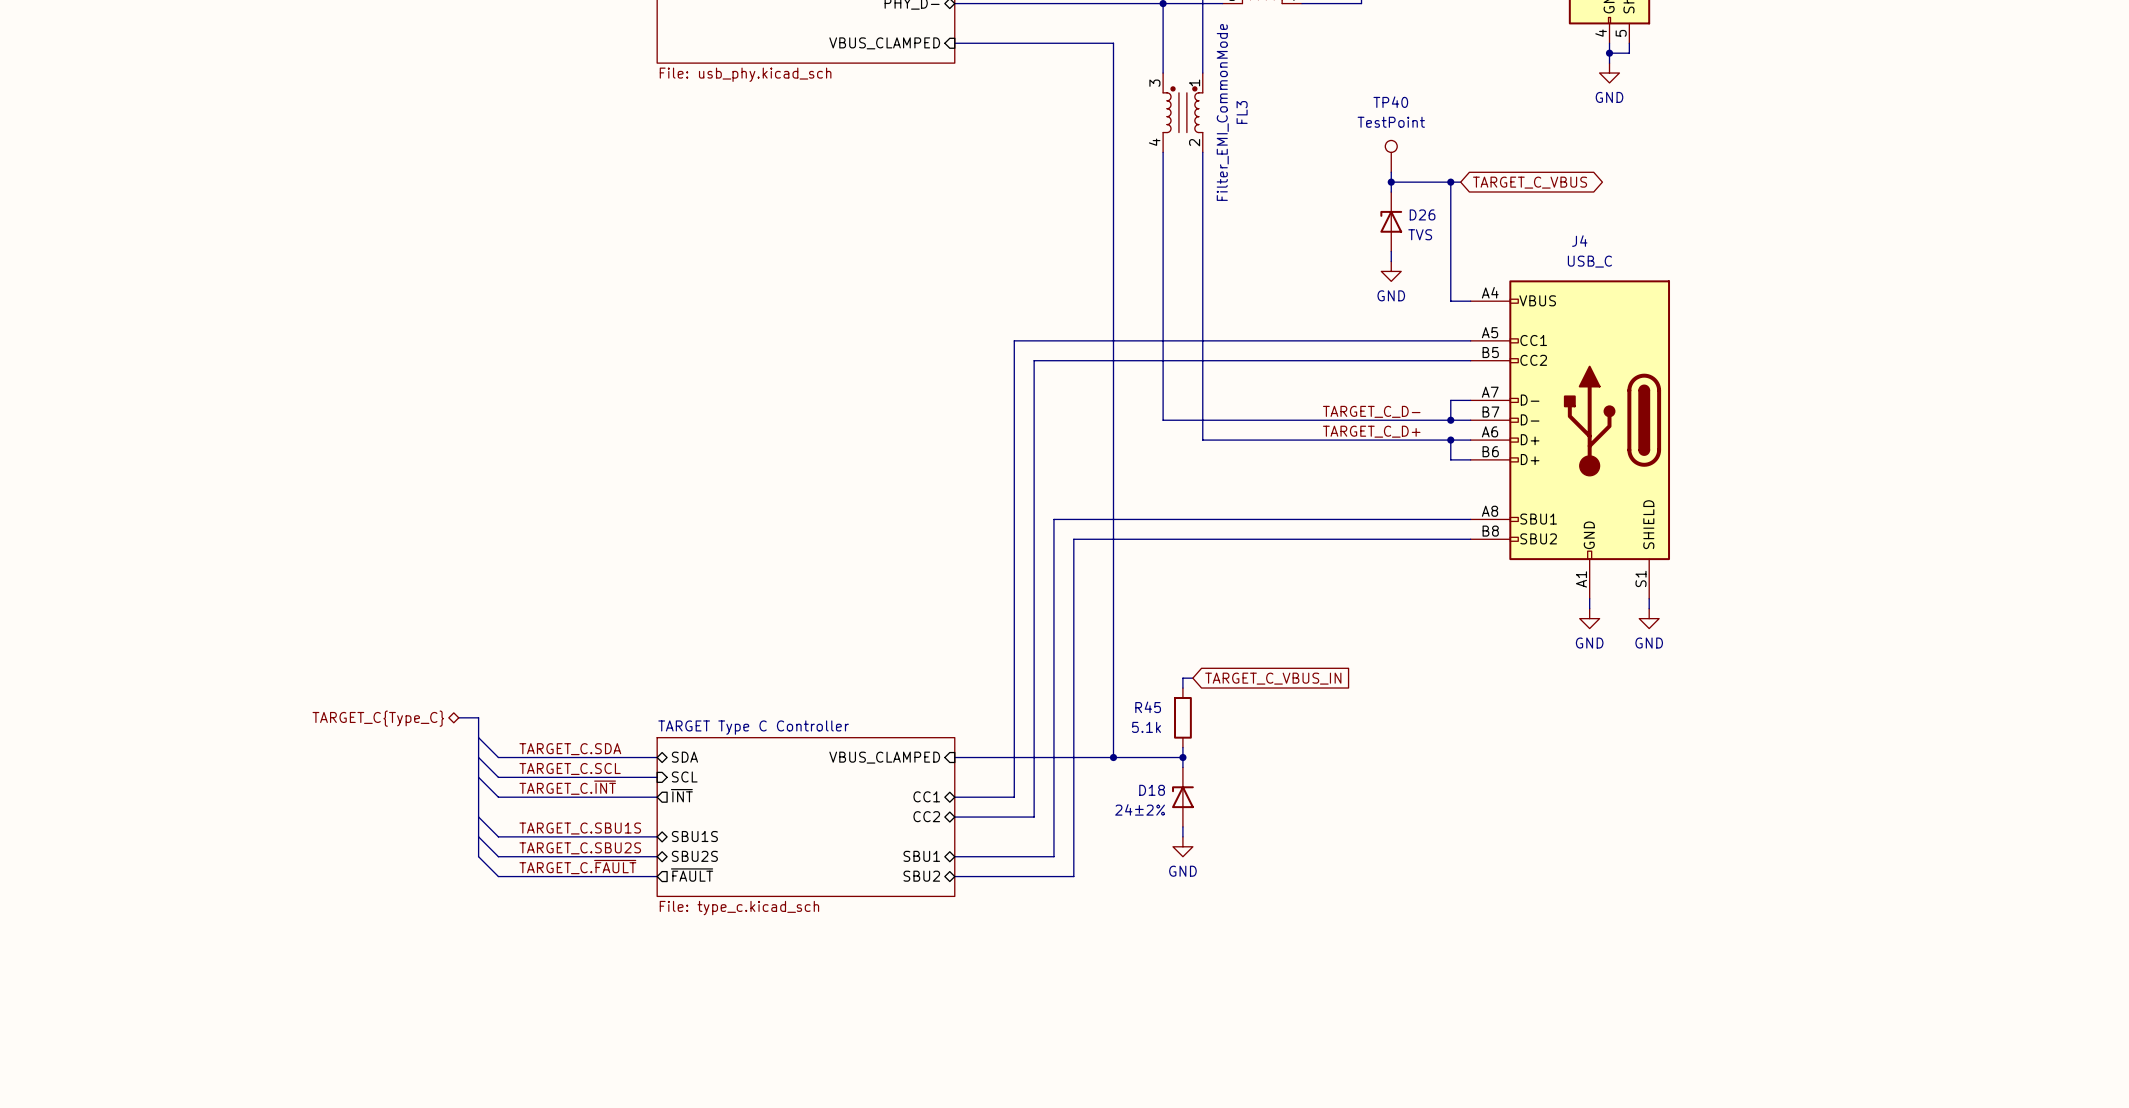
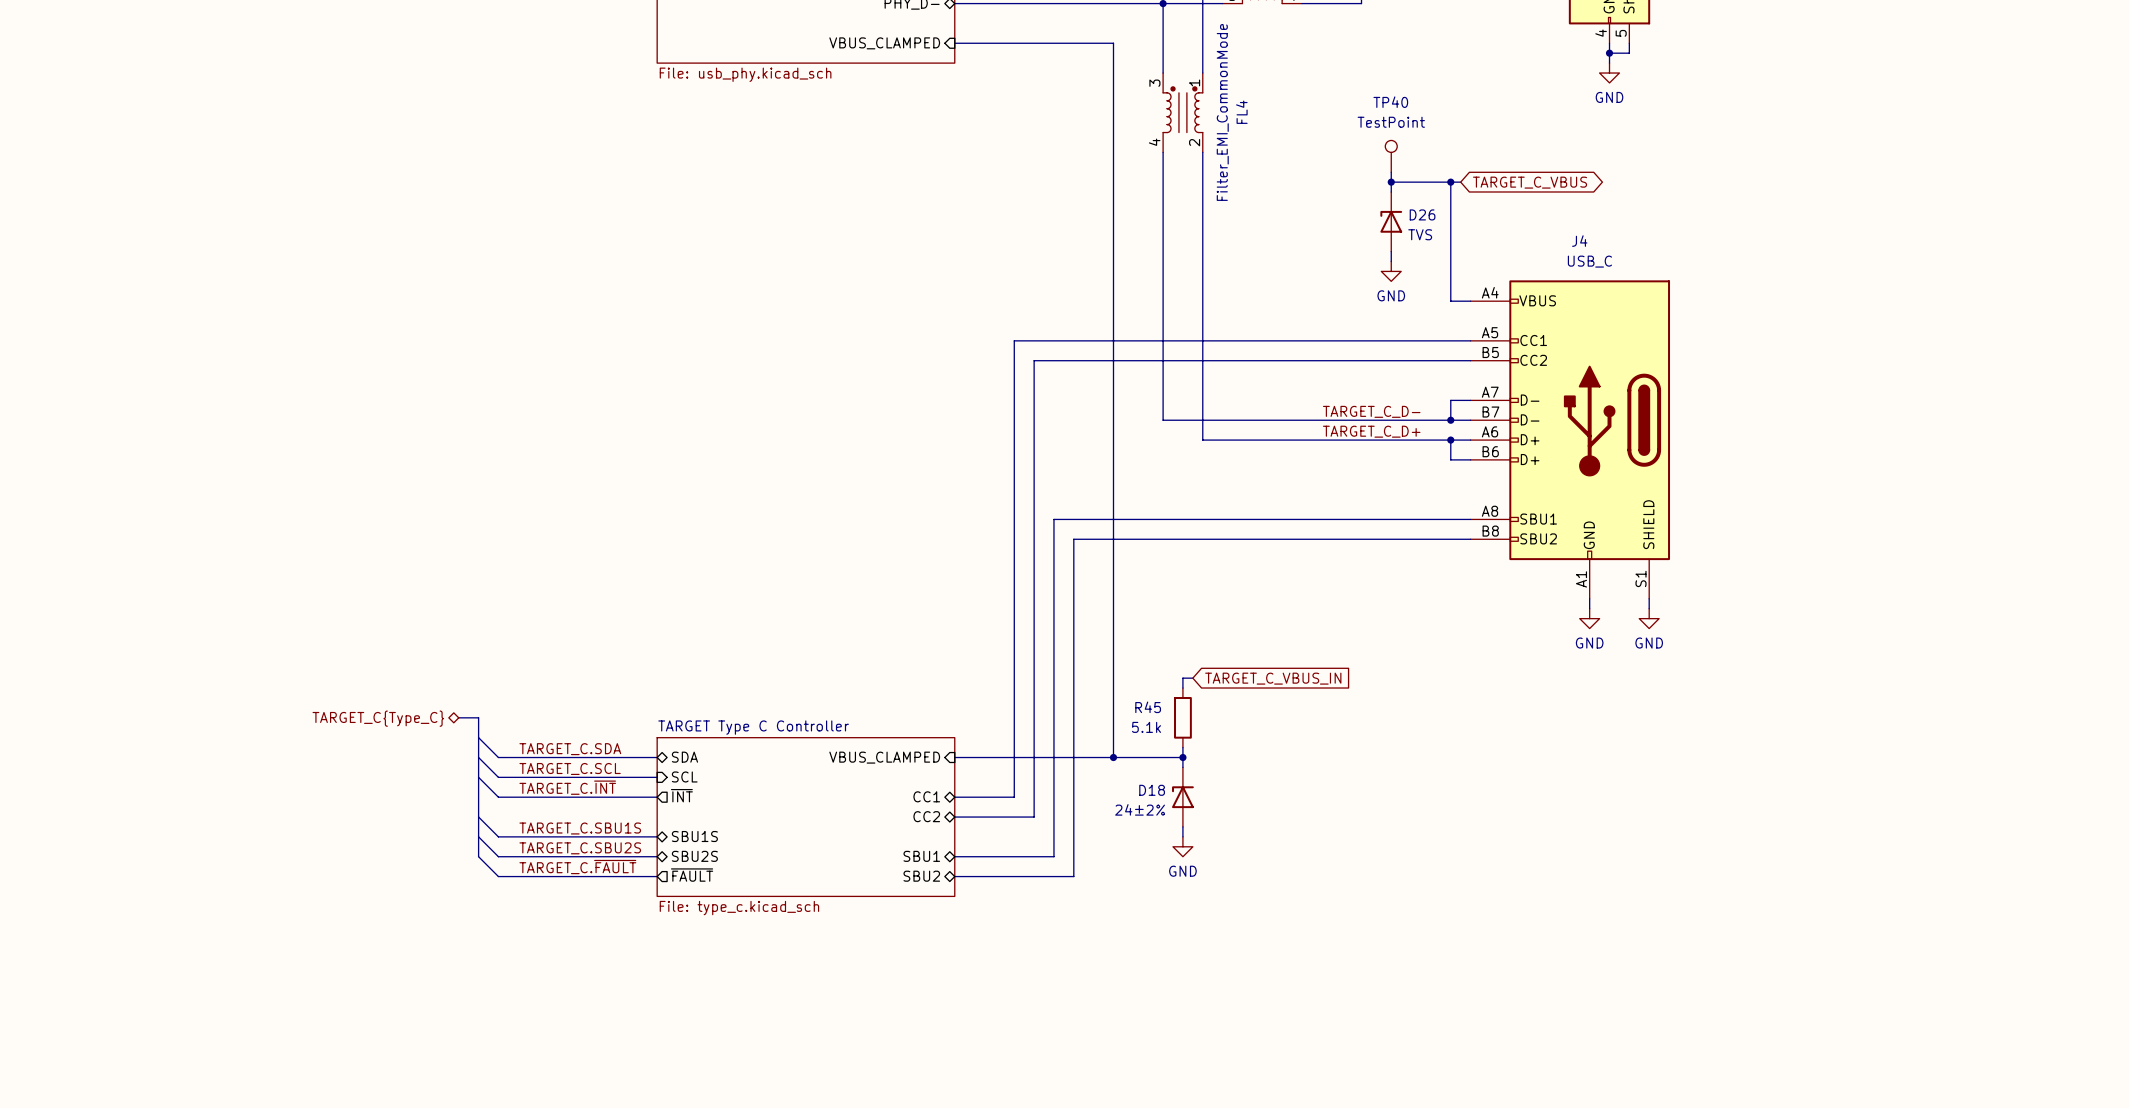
FL3 name: FL3 (1242, 112) -> FL4 (1241, 112)

